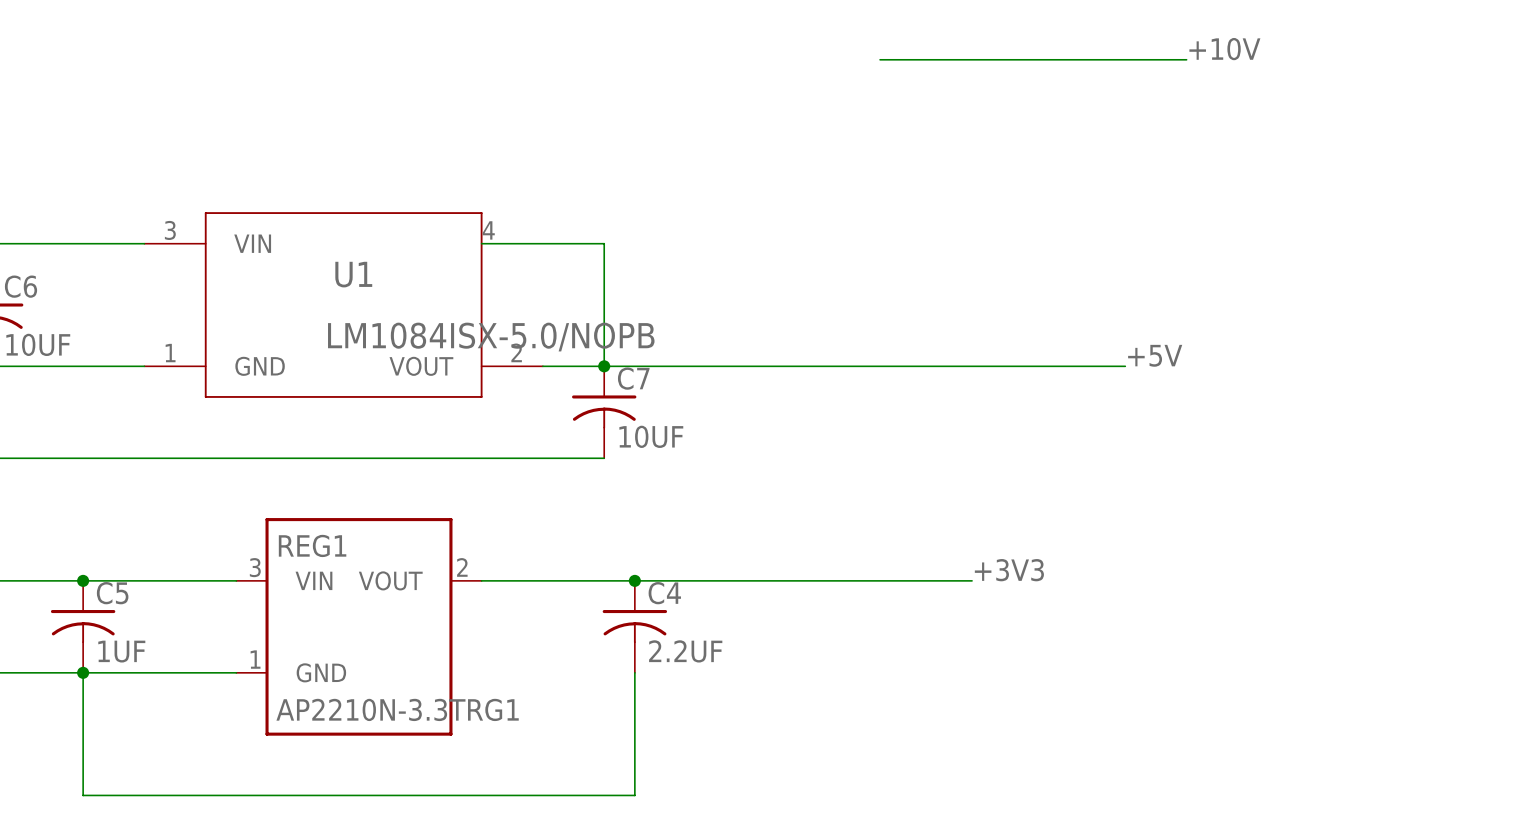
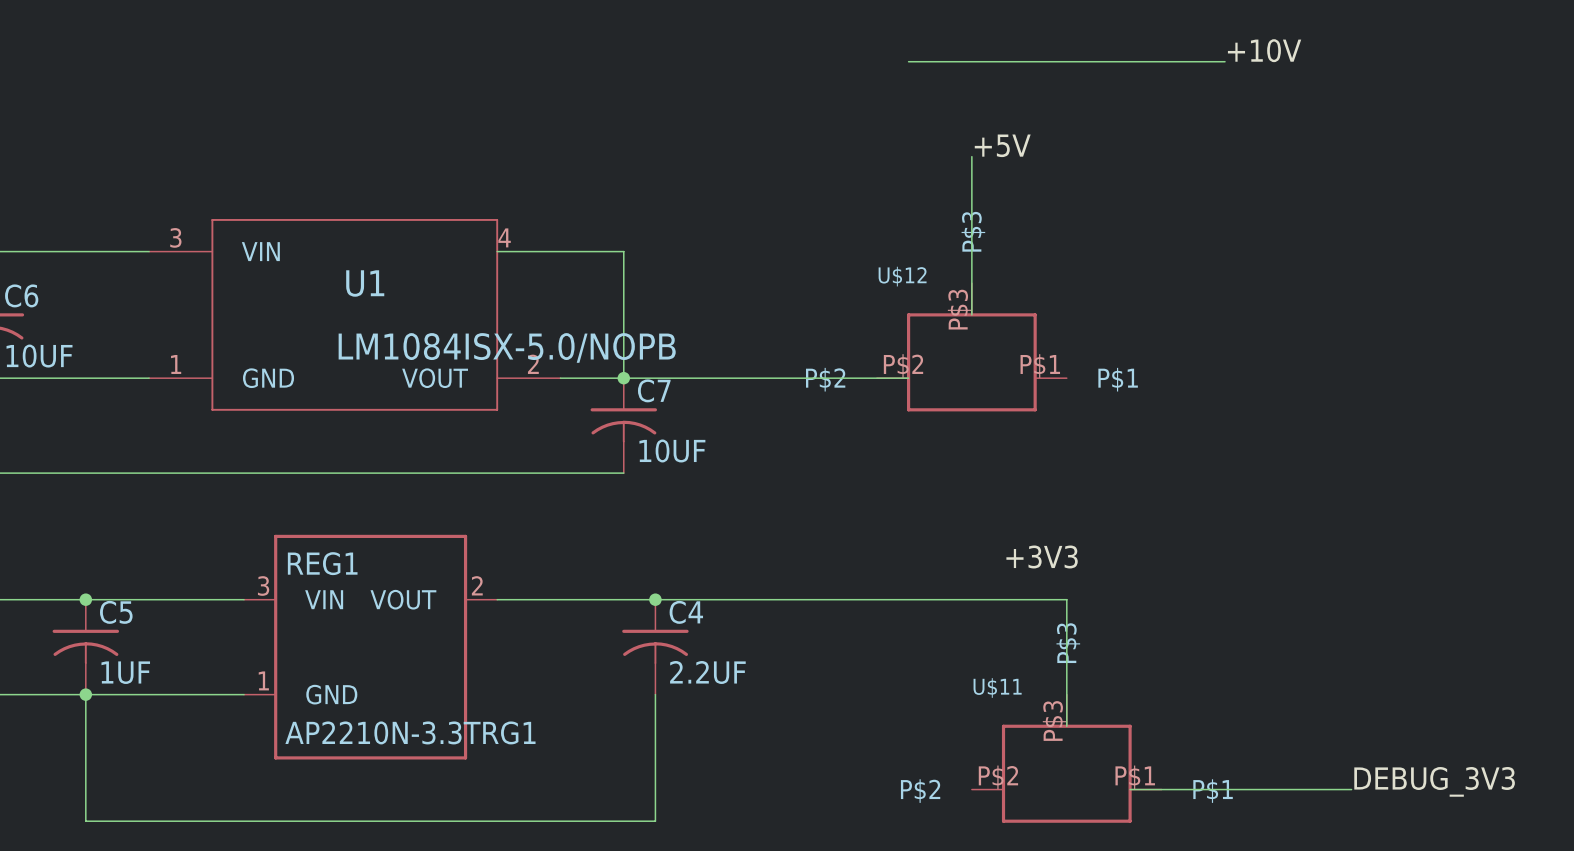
wire: none -> (971, 156) (971, 314)
U$12: none -> (971, 347)
label position: +5V (1155, 355) -> +5V (1002, 145)
wire: (880, 366) (1125, 366) -> none
label position: +3V3 (1009, 570) -> +3V3 (1042, 556)
wire: none -> (1003, 599) (1066, 599) (1066, 726)
U$11: none -> (1066, 758)
label: none -> DEBUG_3V3 (1434, 781)
wire: none -> (1130, 789) (1351, 789)

